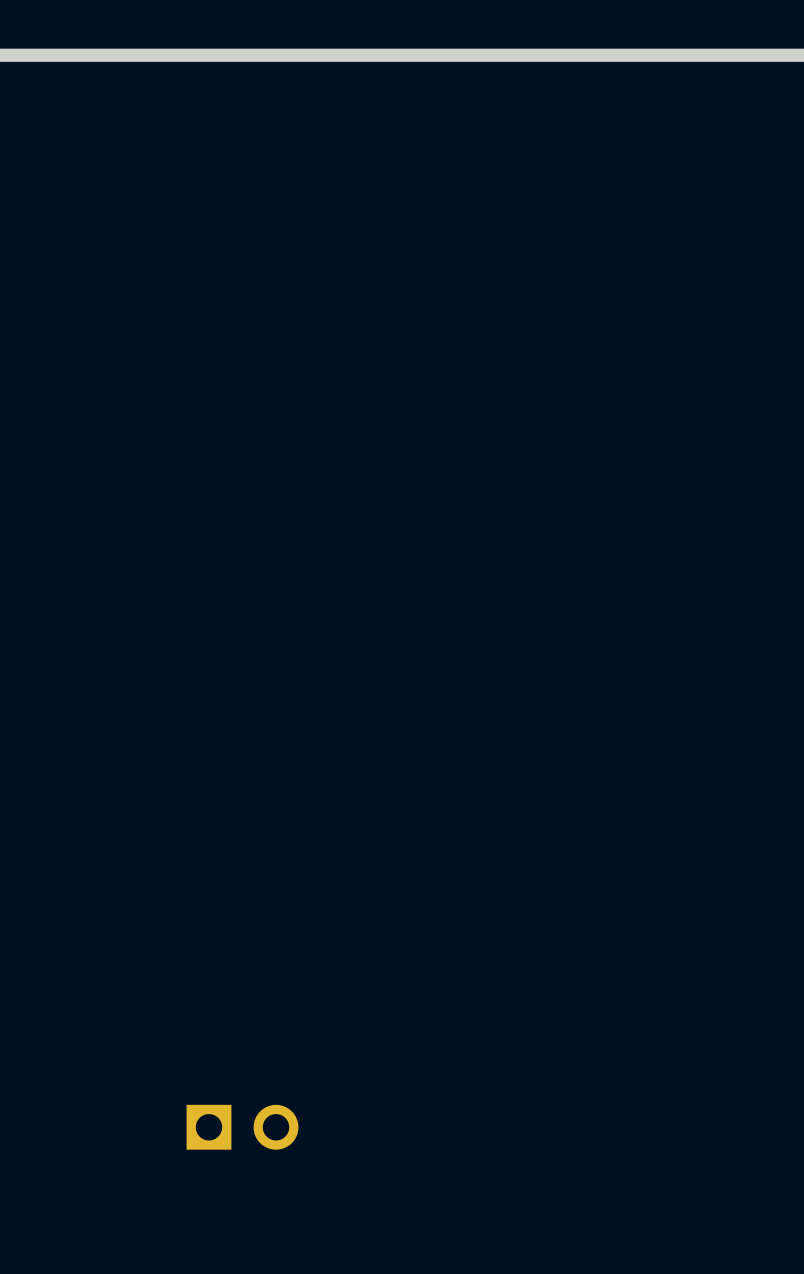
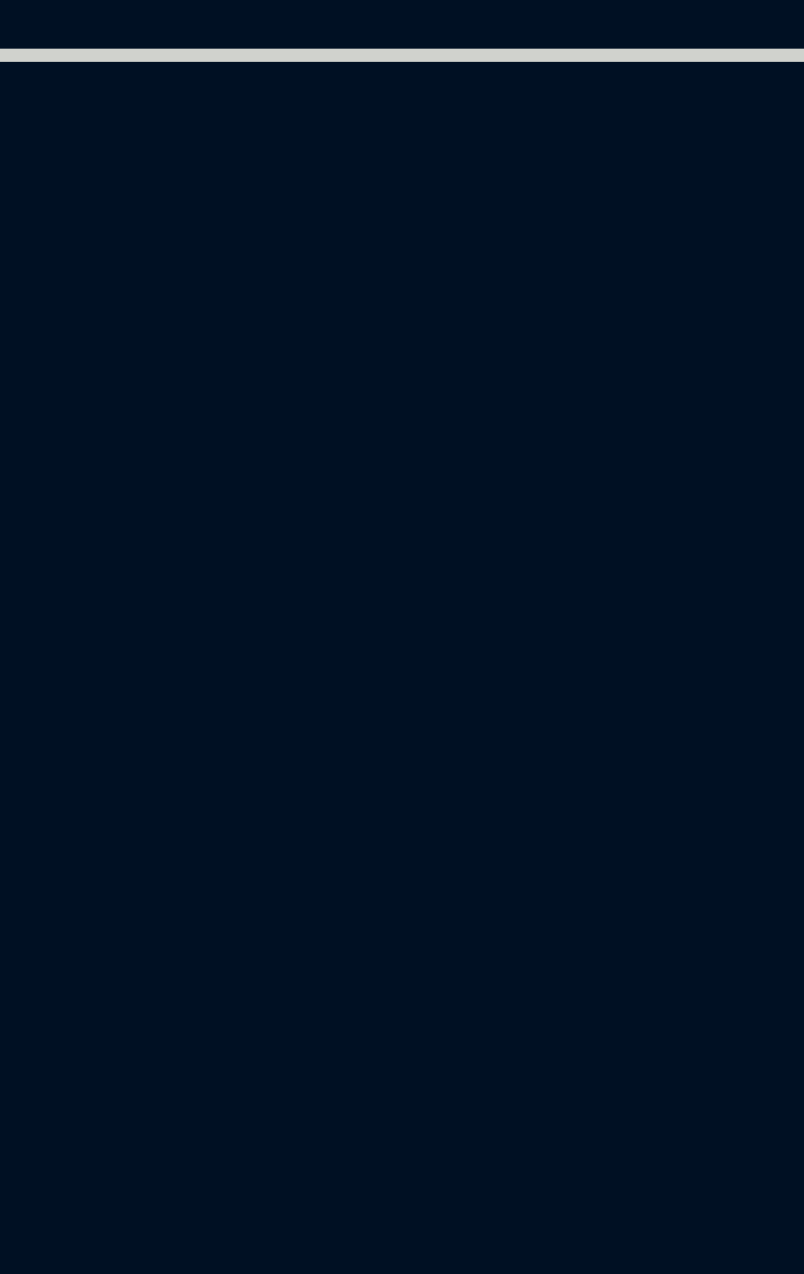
part: (242, 1127) -> none

